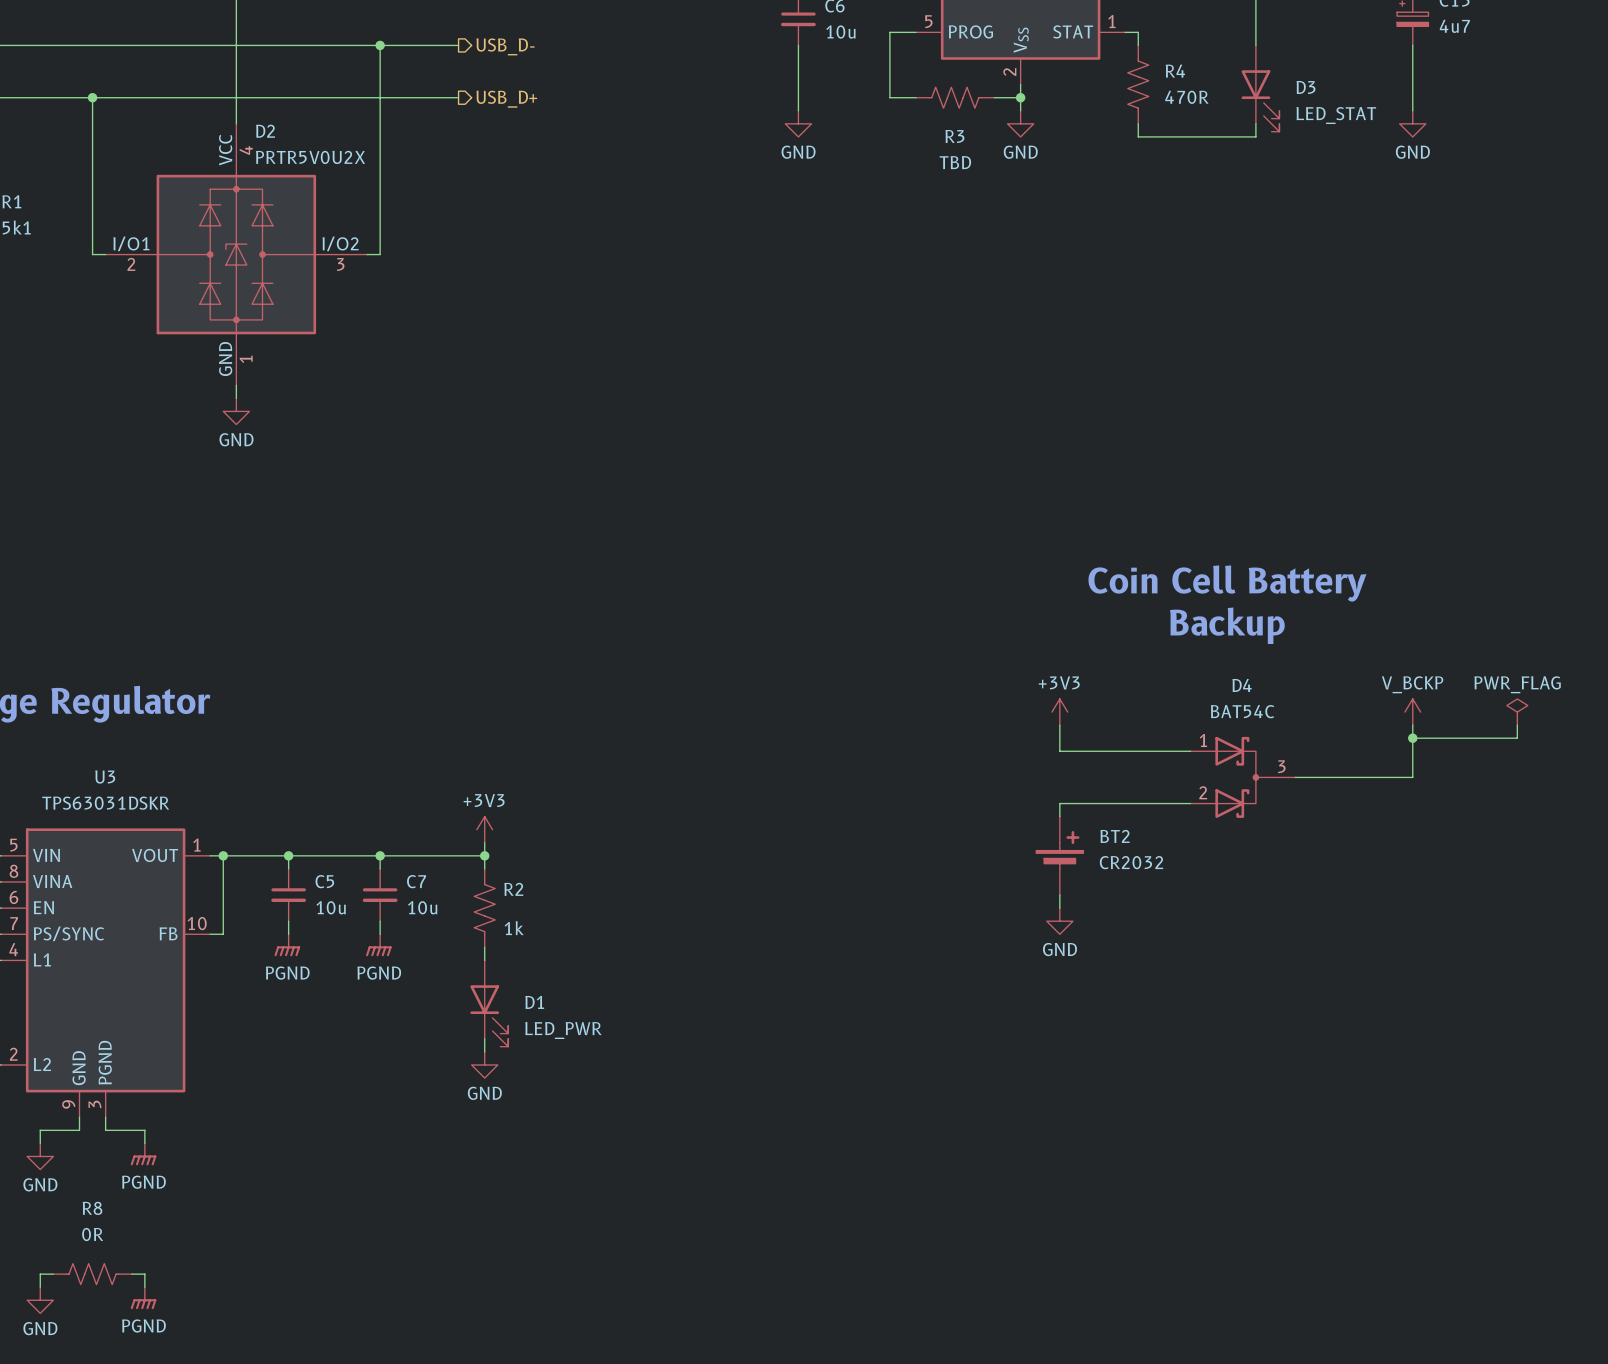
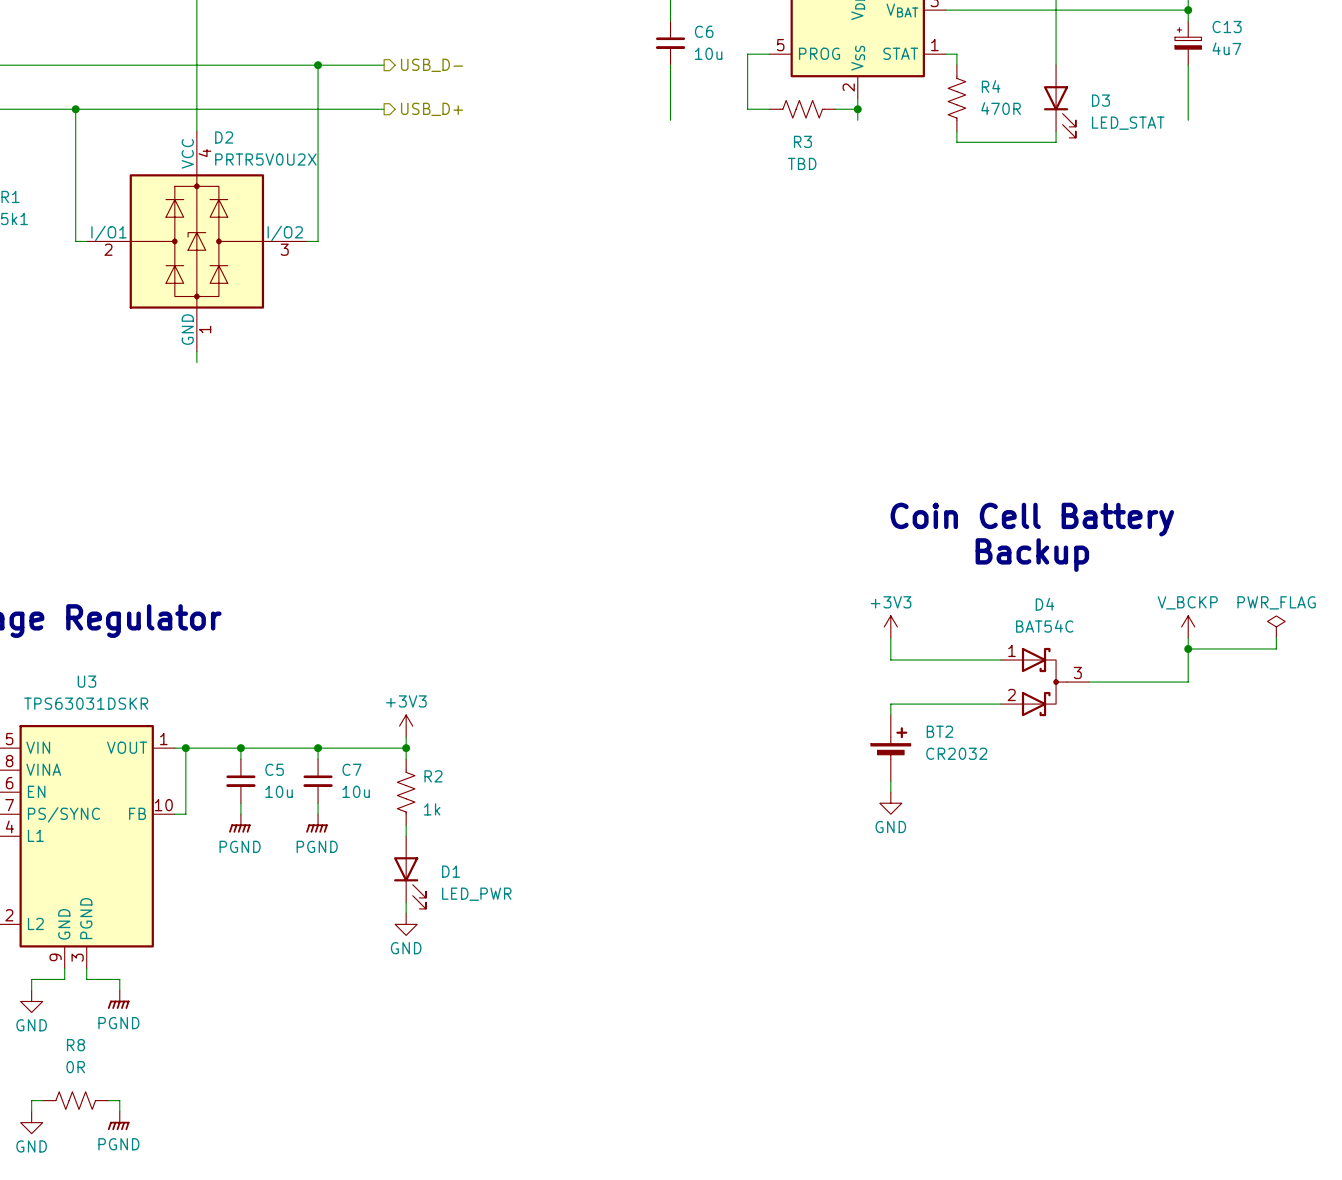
power symbol: GND (798, 123) -> none
power symbol: GND (1020, 123) -> none
power symbol: GND (1412, 123) -> none
power symbol: GND (236, 411) -> none

